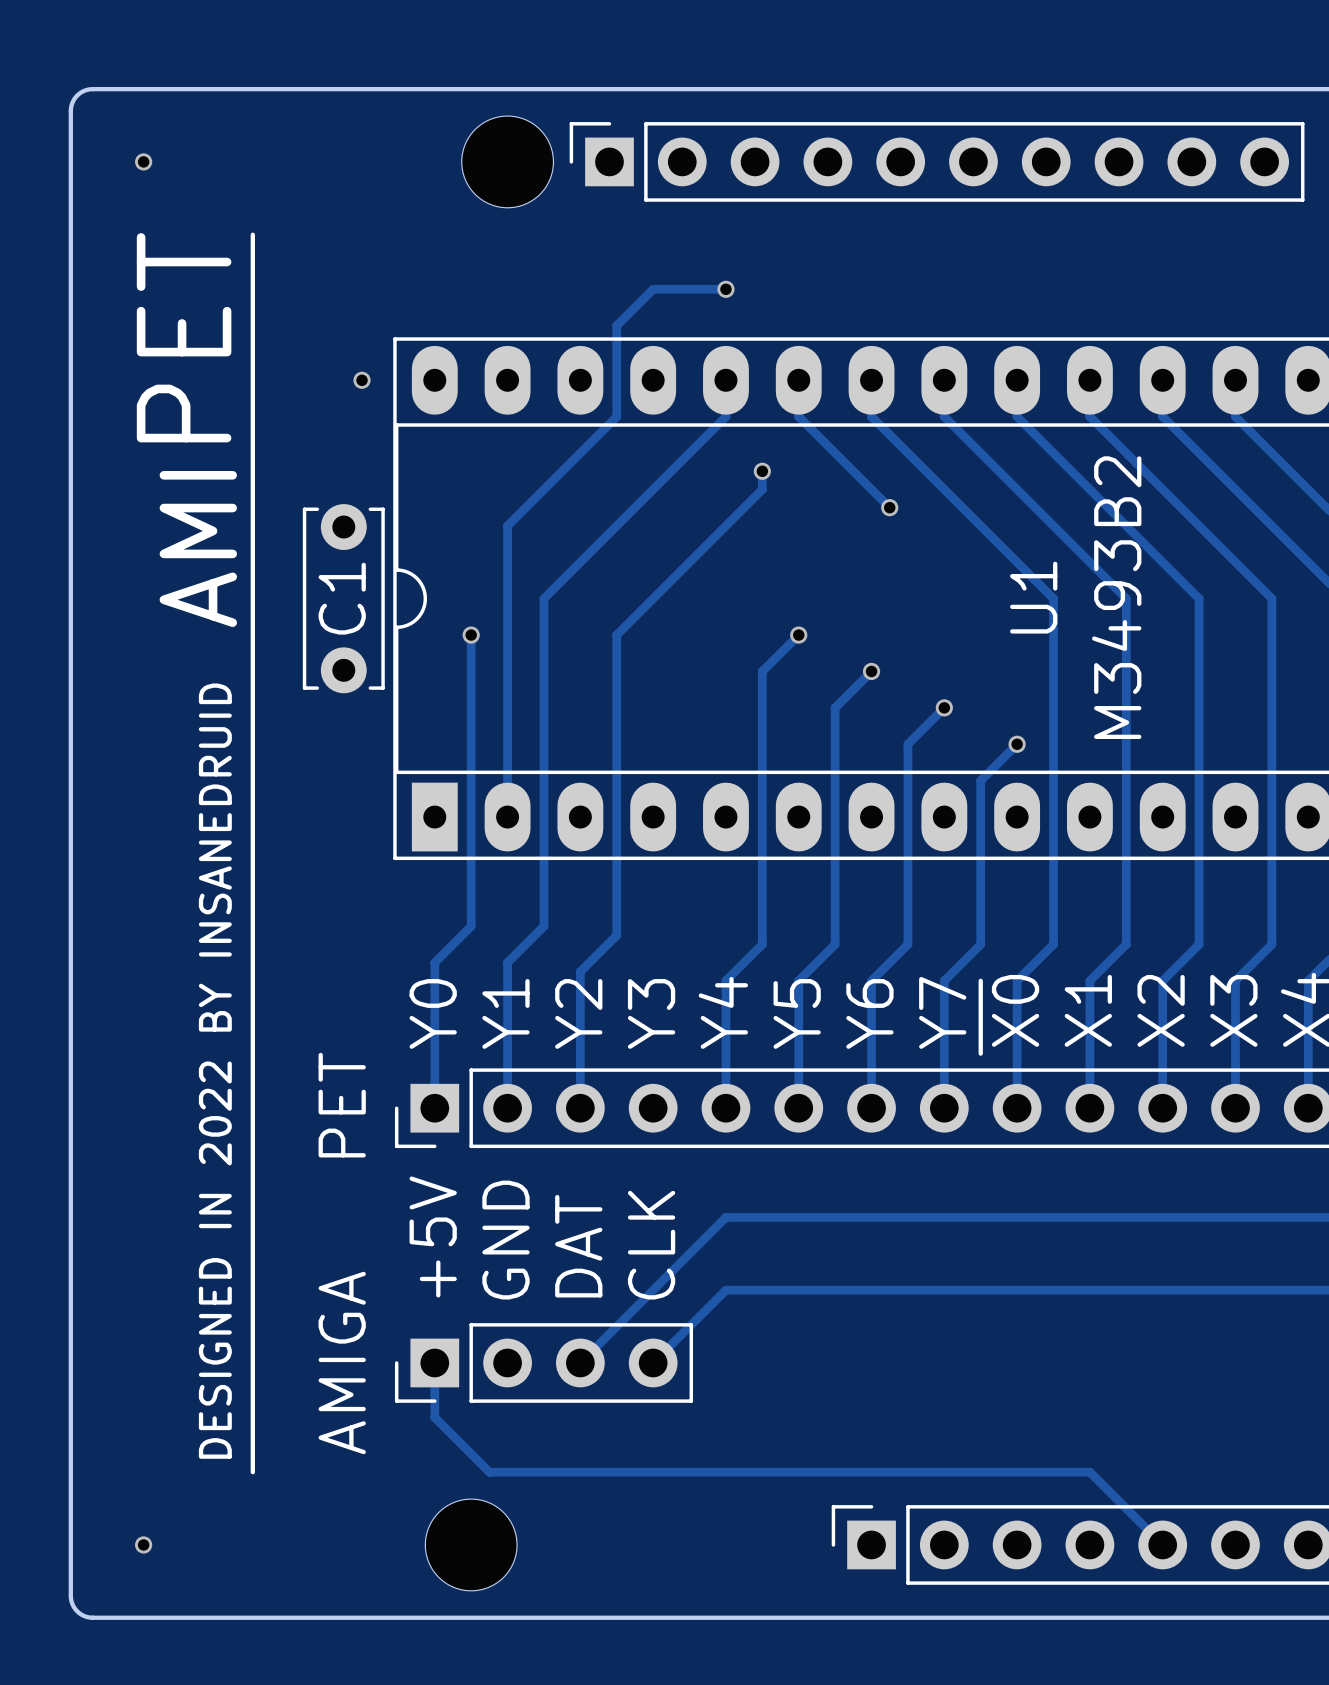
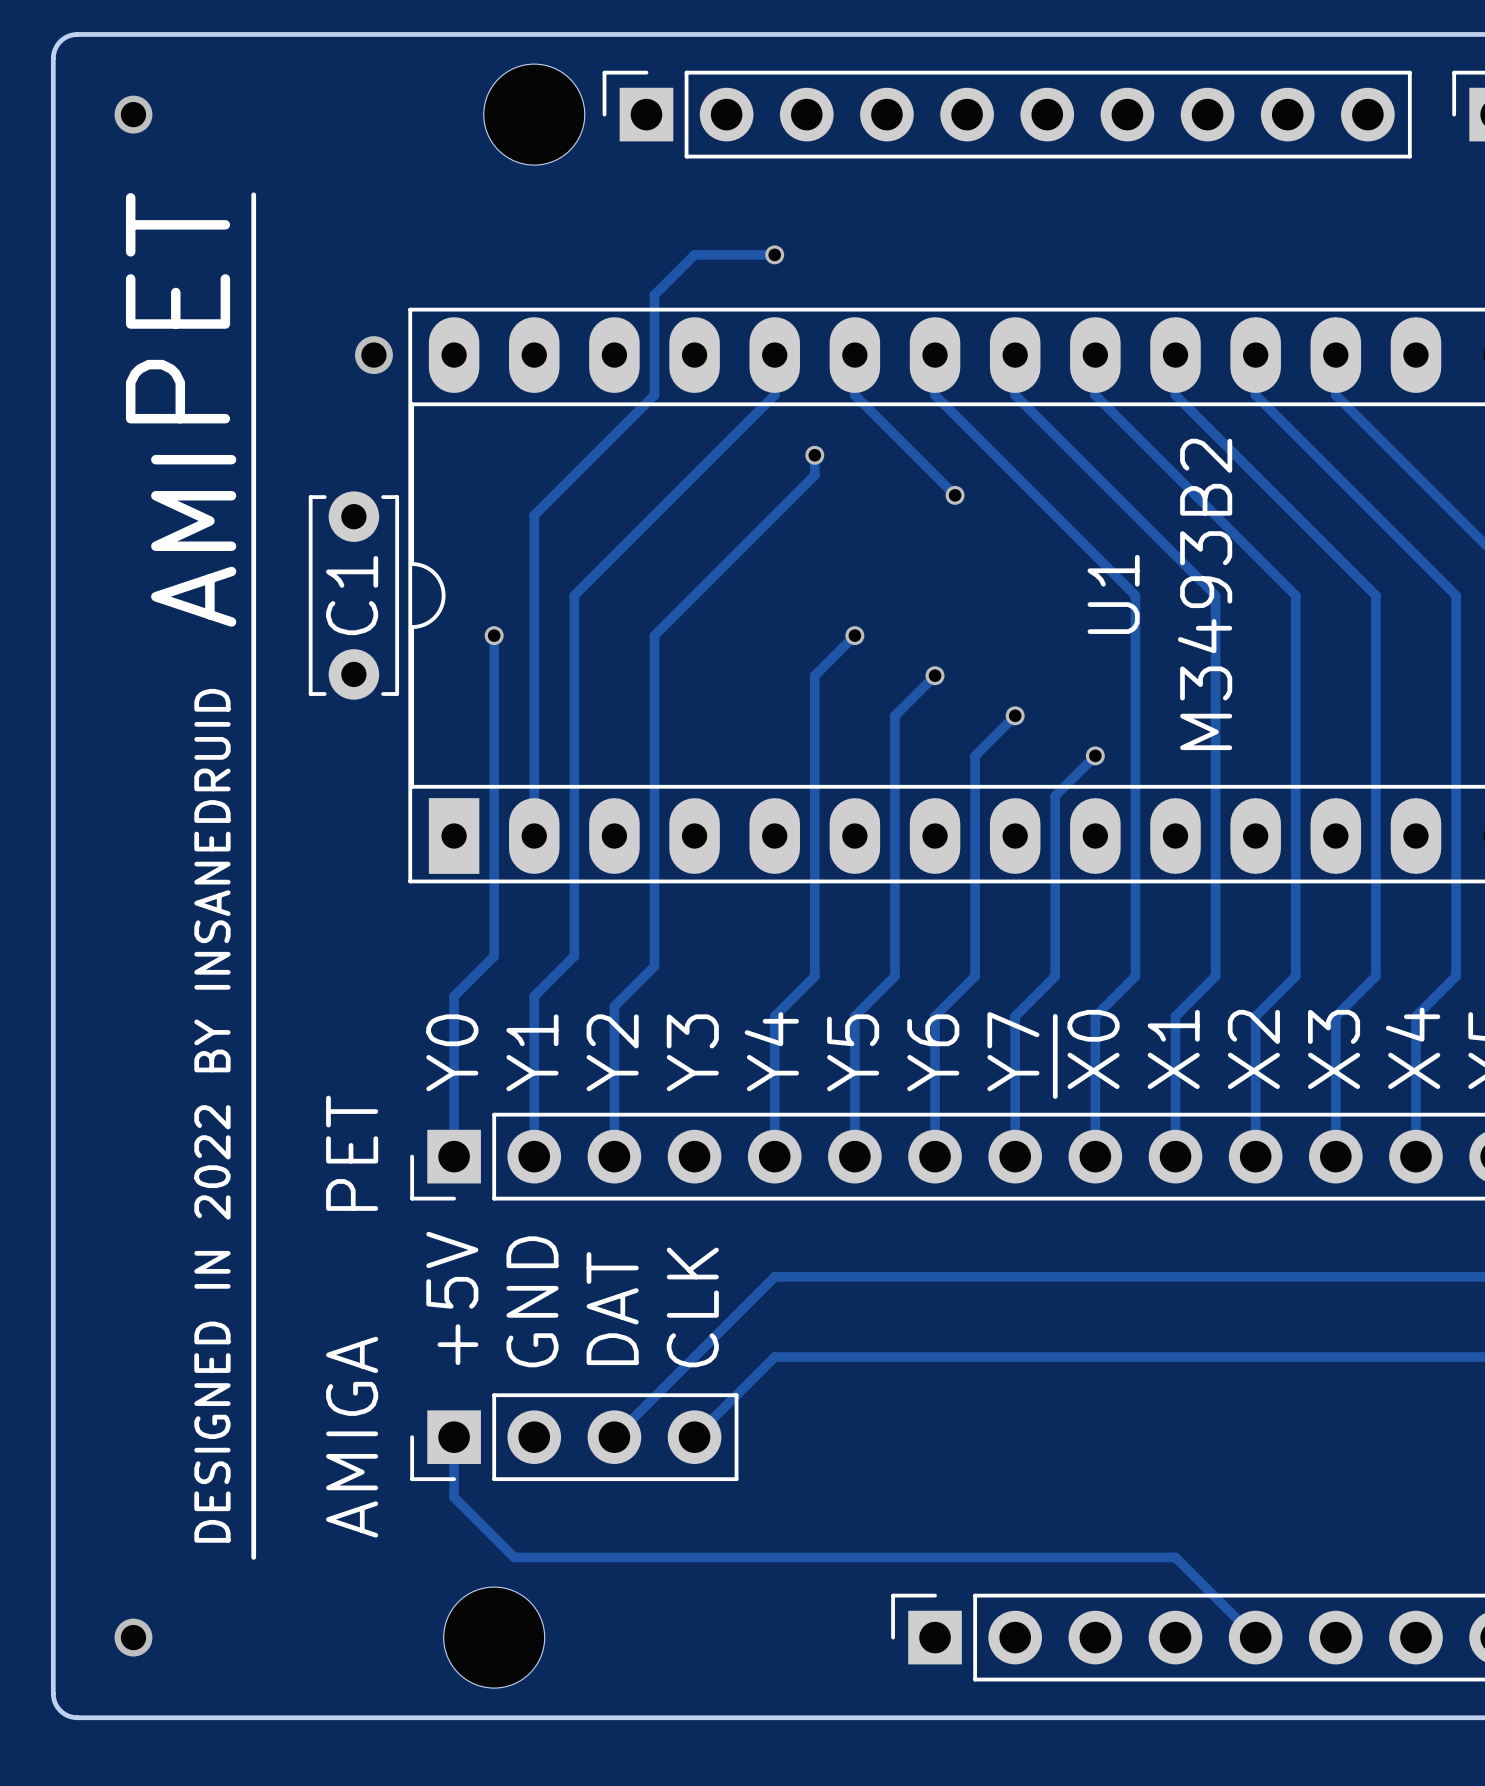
via size: [135, 153, 153, 171] -> [114, 95, 153, 134]
via size: [353, 371, 371, 389] -> [355, 336, 393, 375]
via size: [135, 1536, 153, 1554] -> [114, 1618, 153, 1657]

